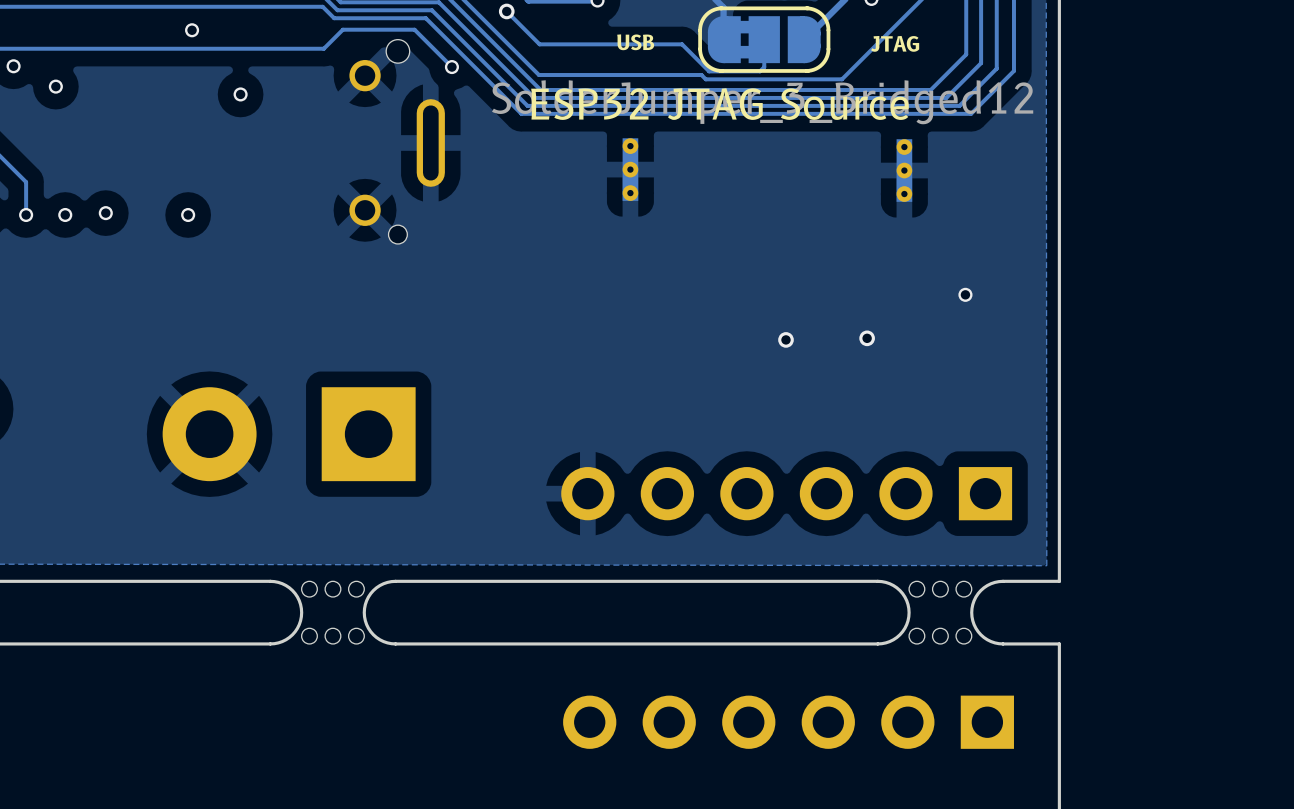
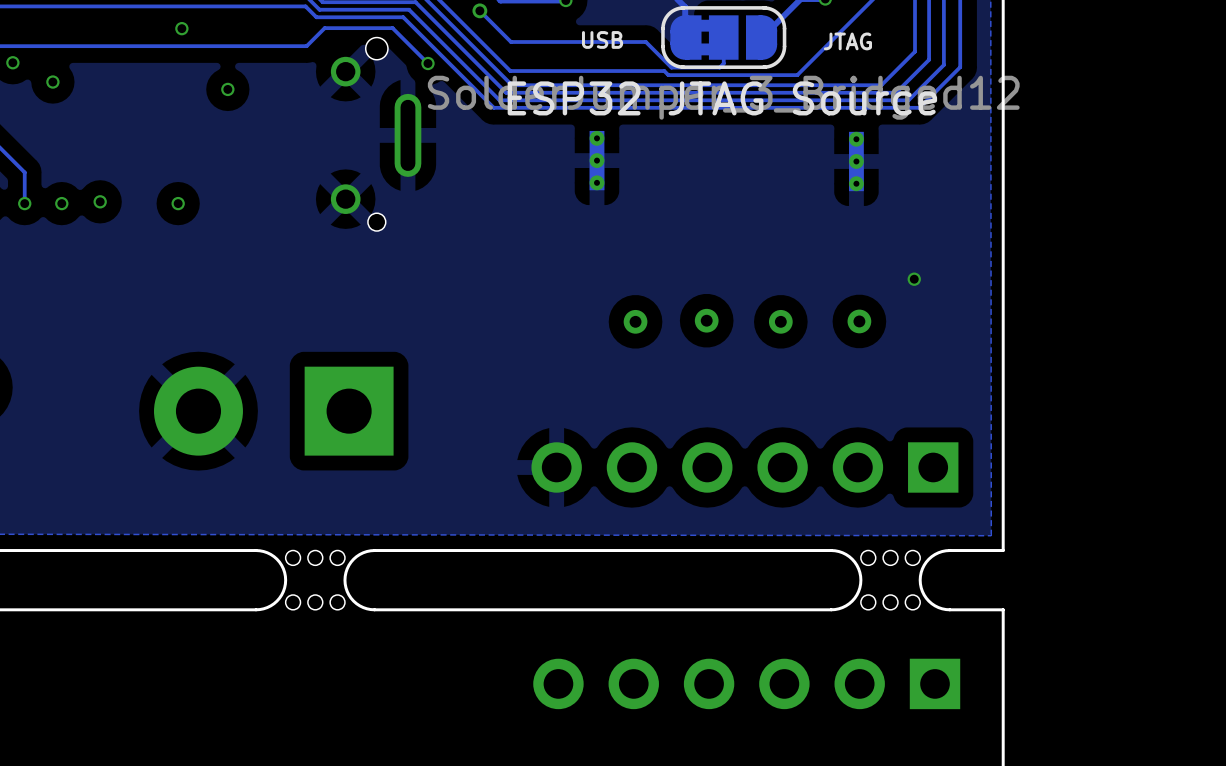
via: none -> (706, 320)
via: (867, 338) -> none
via: none -> (635, 321)
via: (786, 339) -> none
via: none -> (780, 321)
via: none -> (859, 321)

